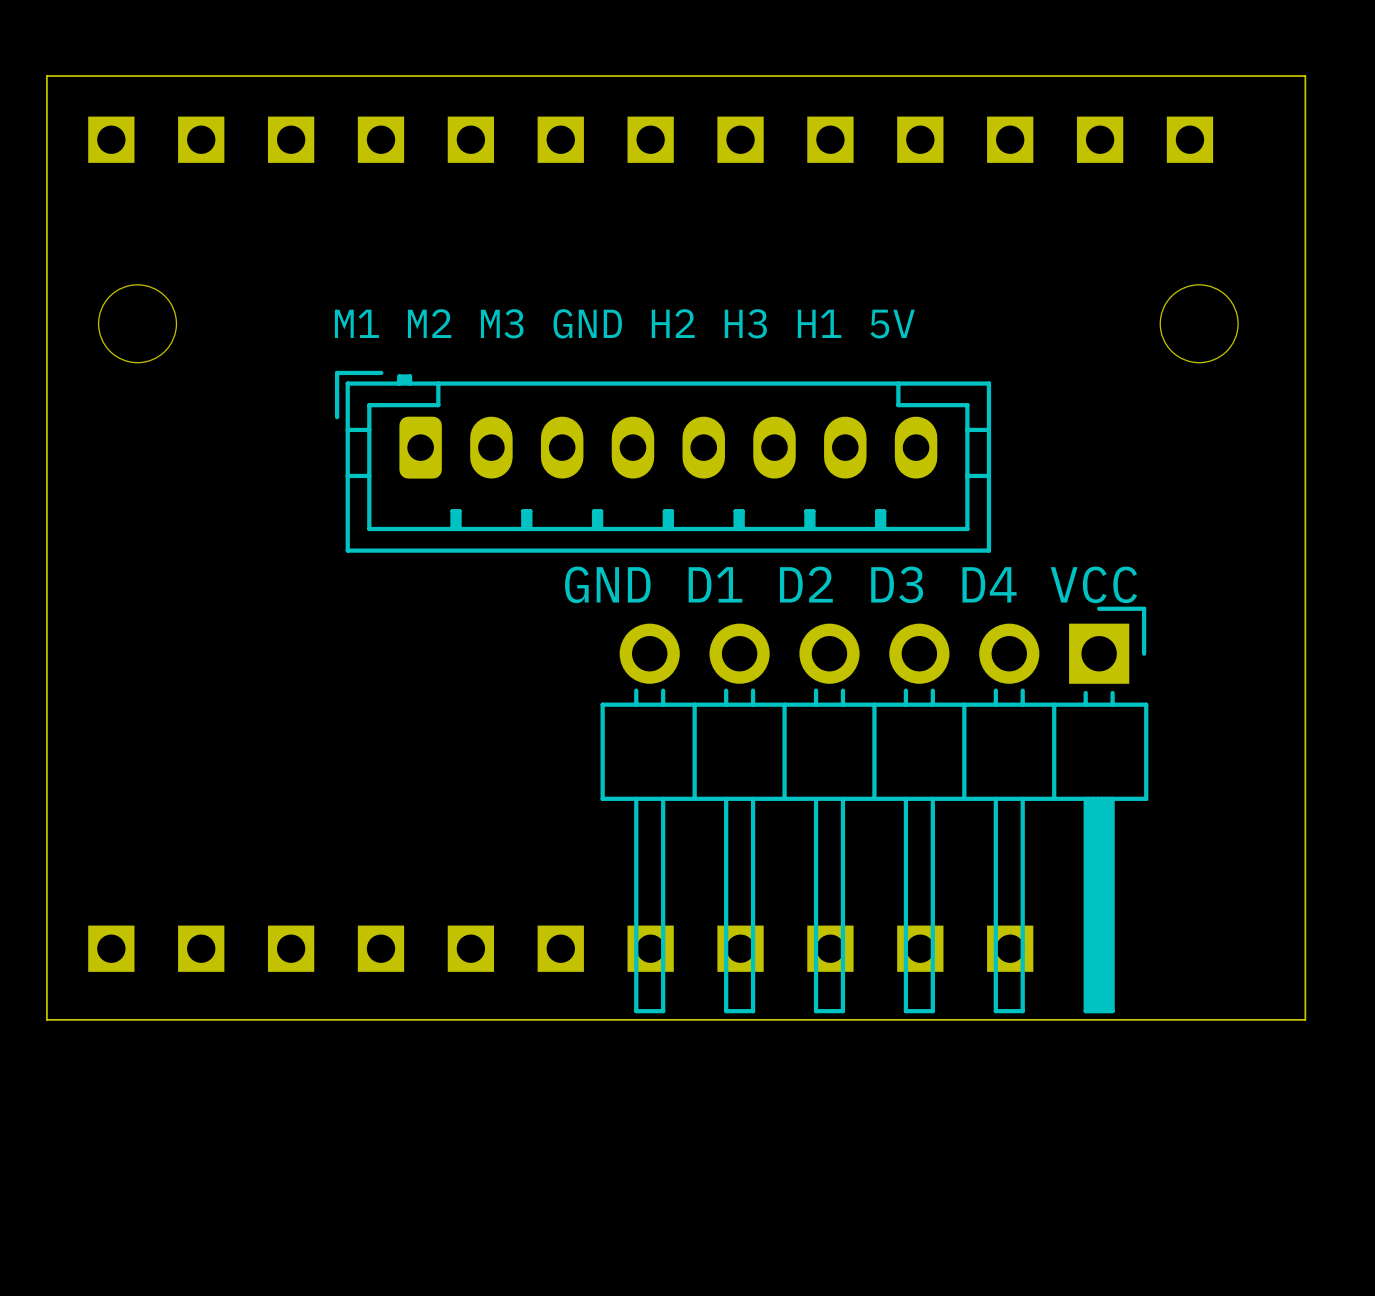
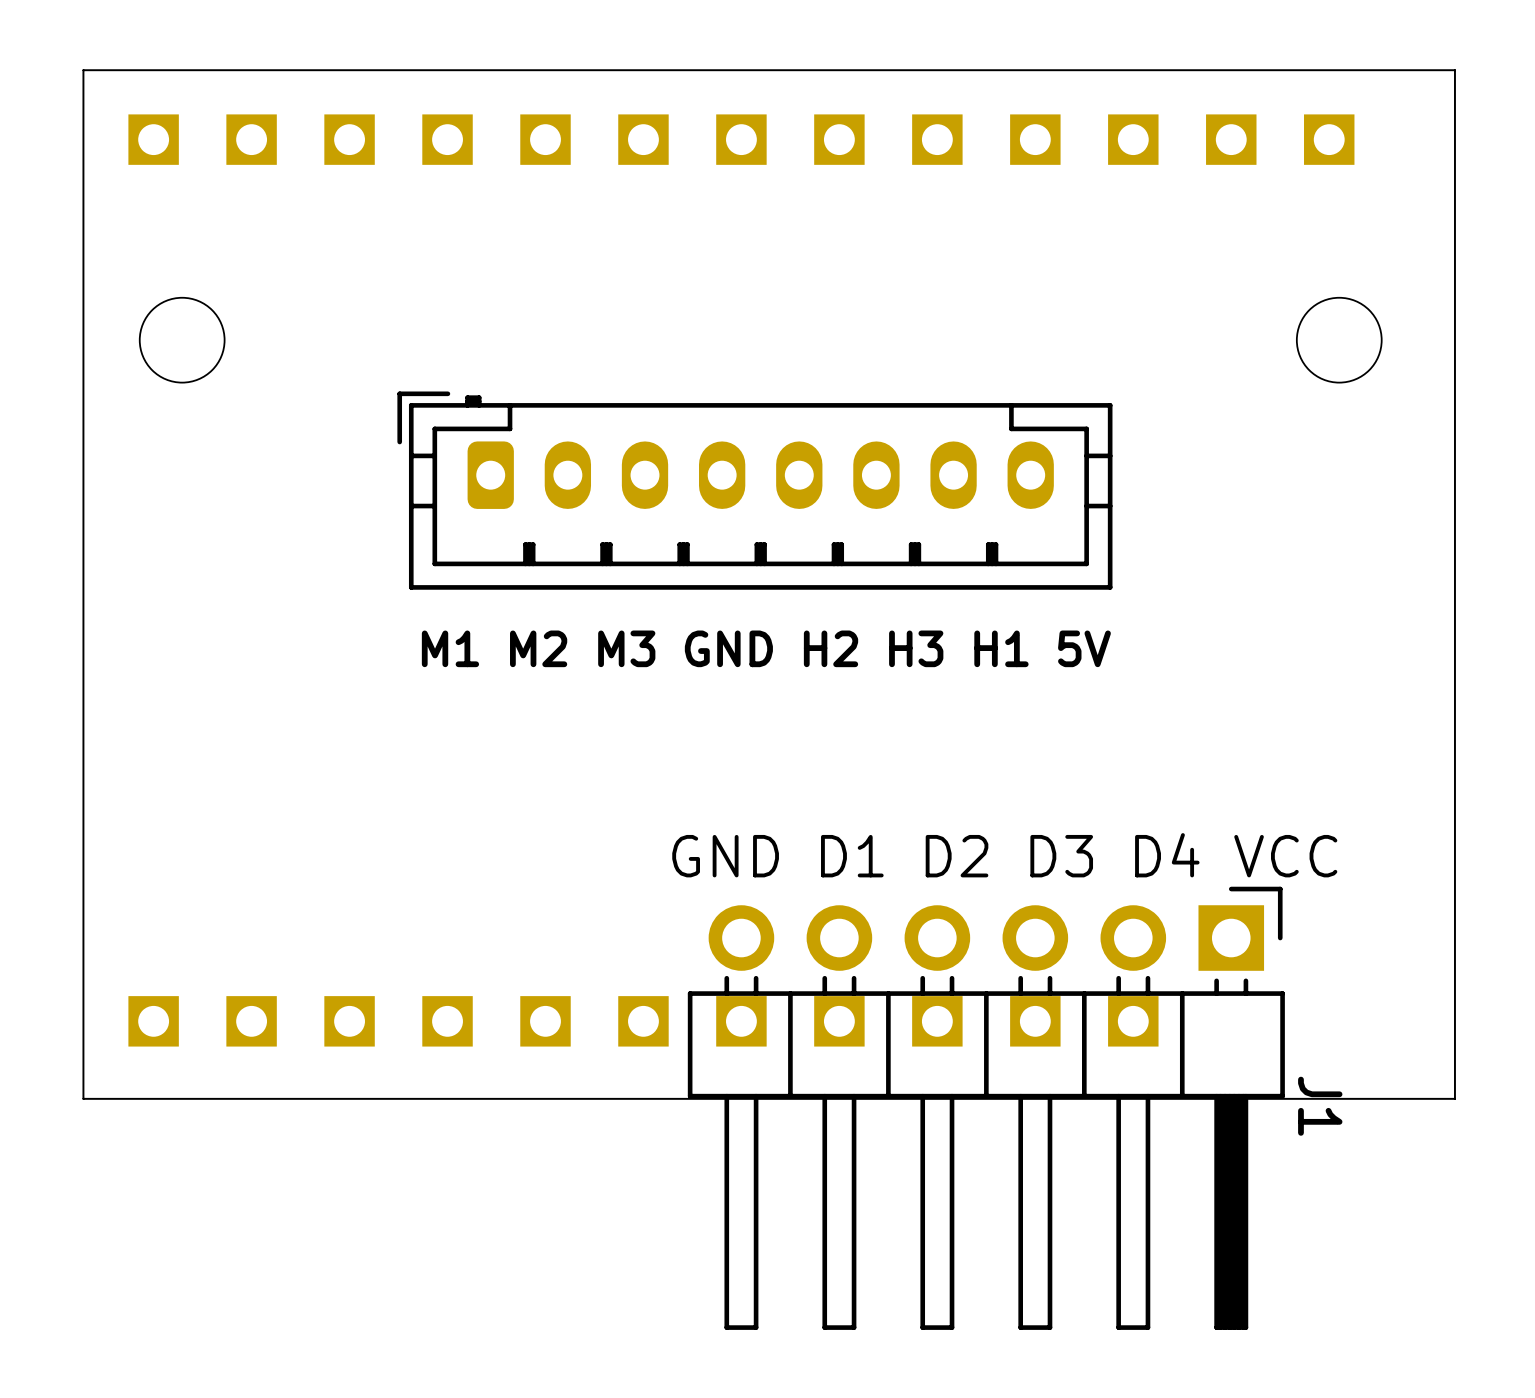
text position: M1 M2 M3 GND H2 H3 H1 5V (624, 323) -> M1 M2 M3 GND H2 H3 H1 5V (766, 648)
text position: GND D1 D2 D3 D4 VCC (851, 584) -> GND D1 D2 D3 D4 VCC (1004, 855)
part: (874, 809) -> none
J1: none -> (986, 1108)

